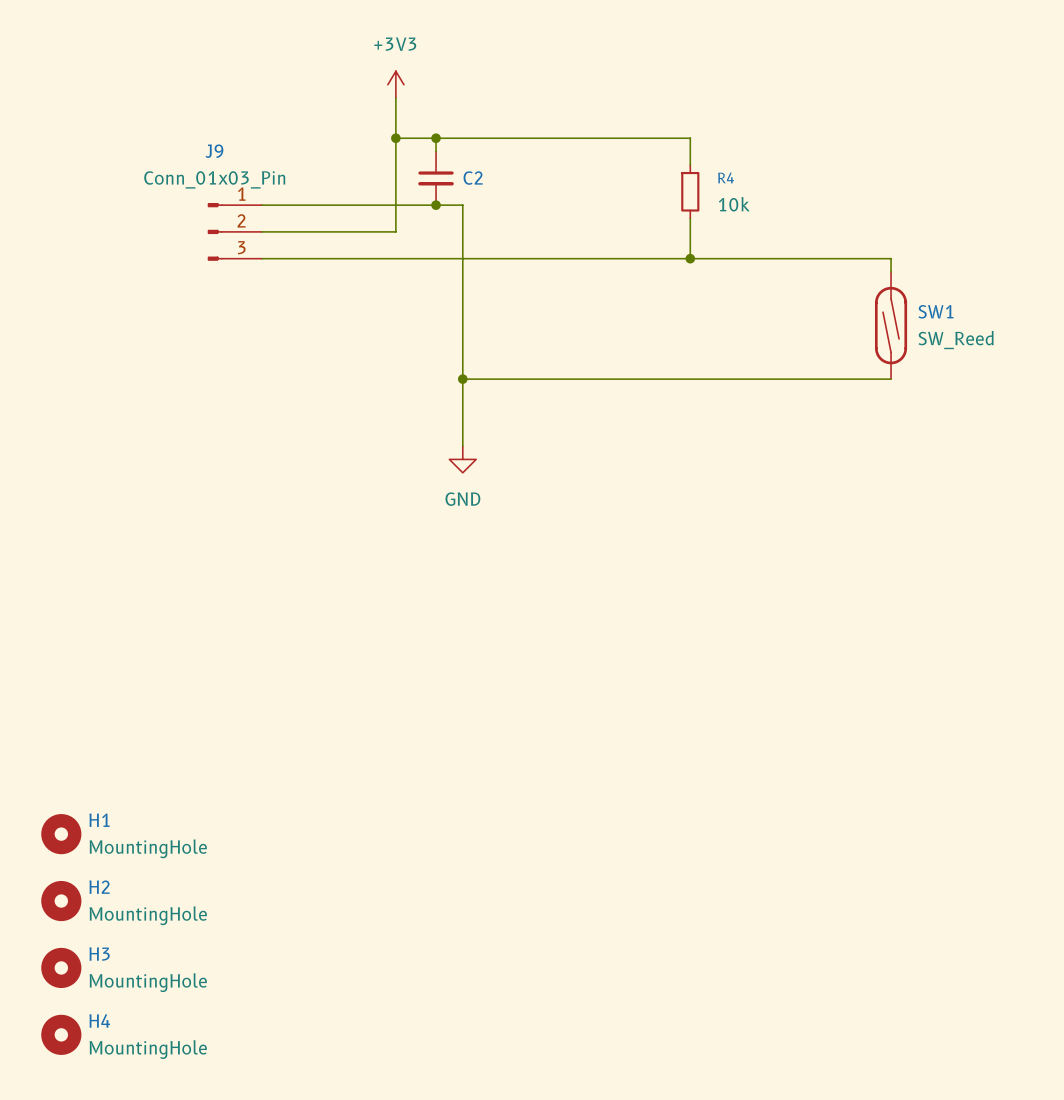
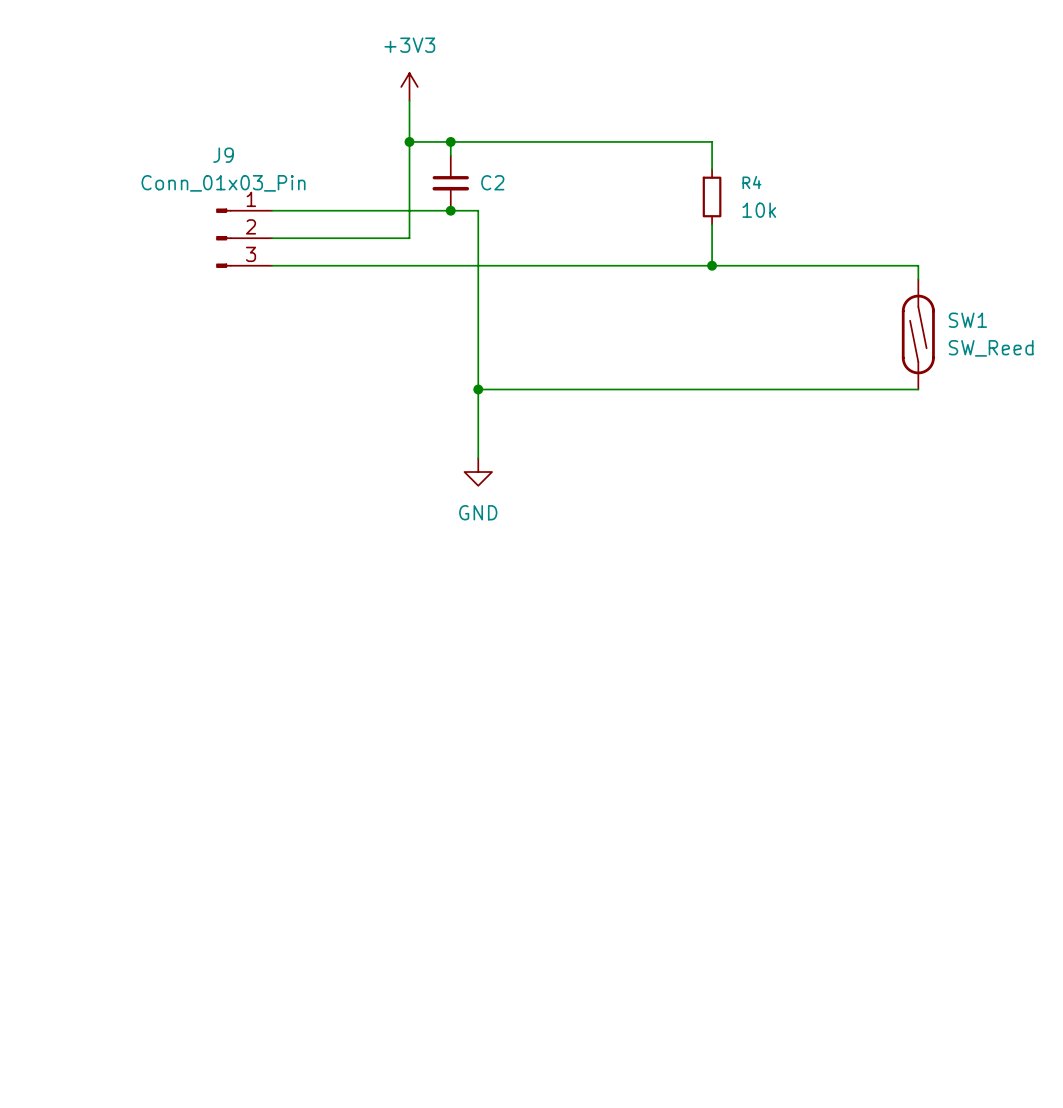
H1: MountingHole (61, 834) -> none
H2: MountingHole (61, 901) -> none
H3: MountingHole (61, 967) -> none
H4: MountingHole (61, 1034) -> none

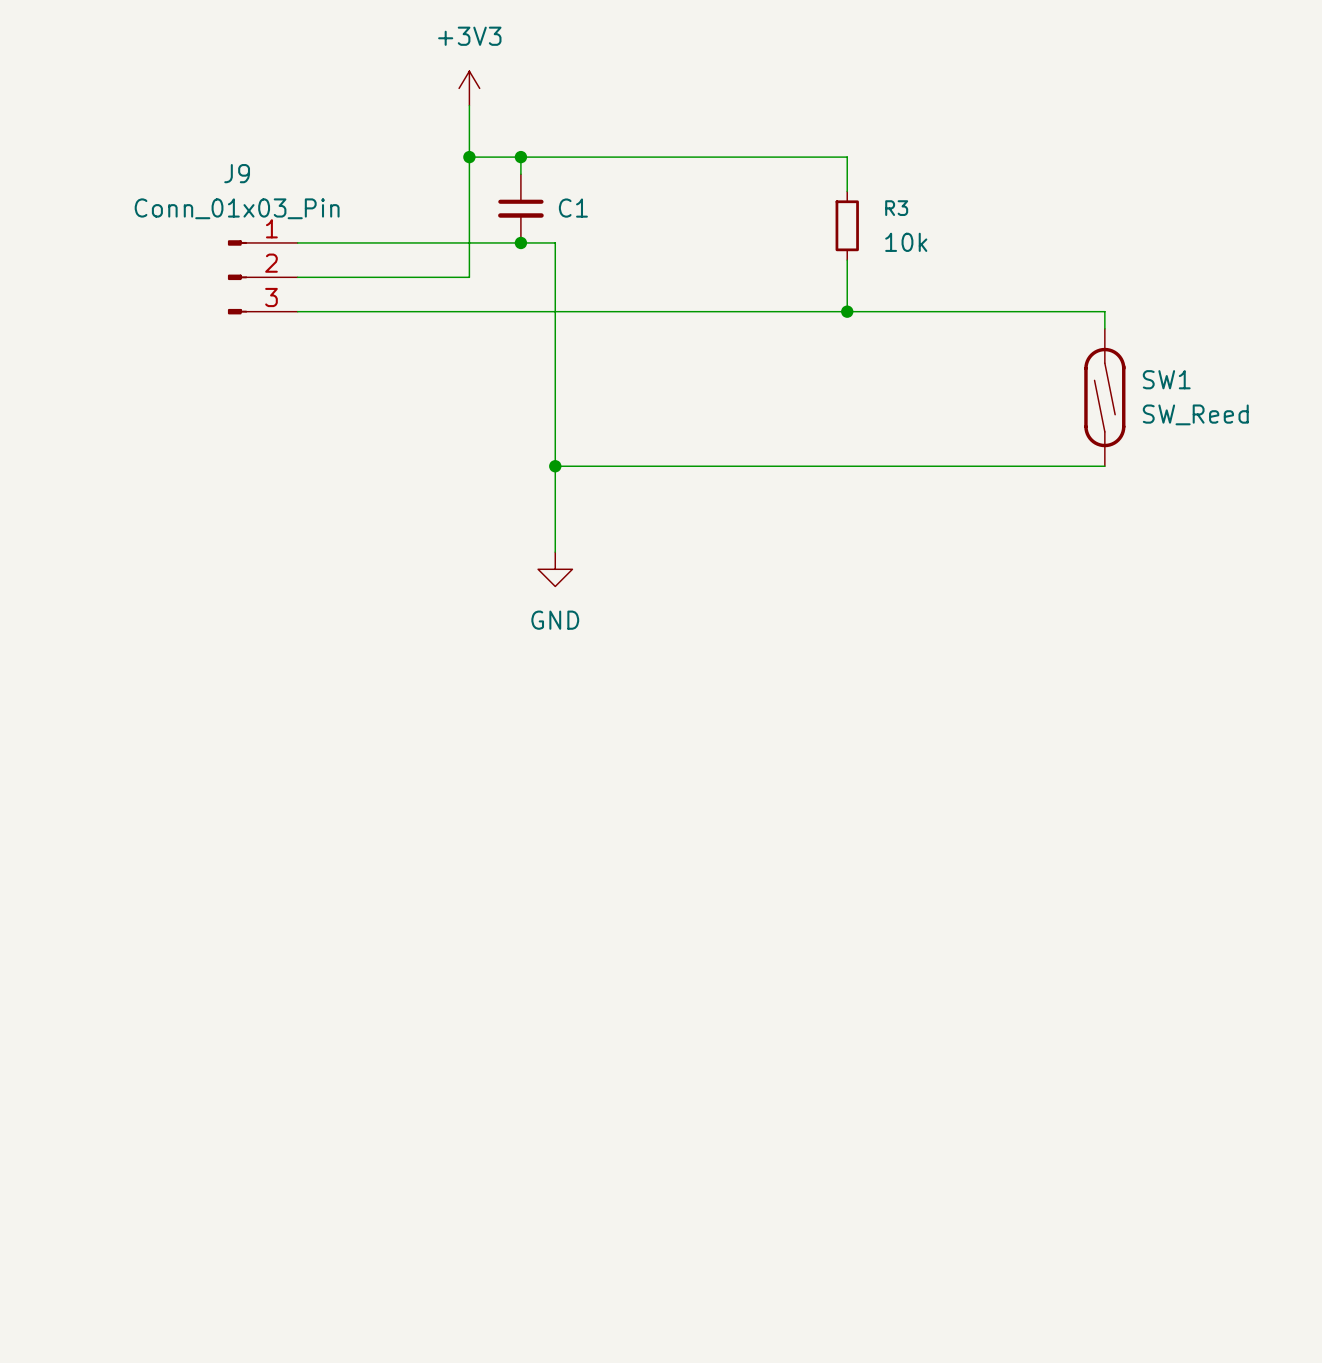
C2 name: C2 (492, 182) -> C1 (573, 208)
R4 name: R4 (751, 182) -> R3 (896, 208)

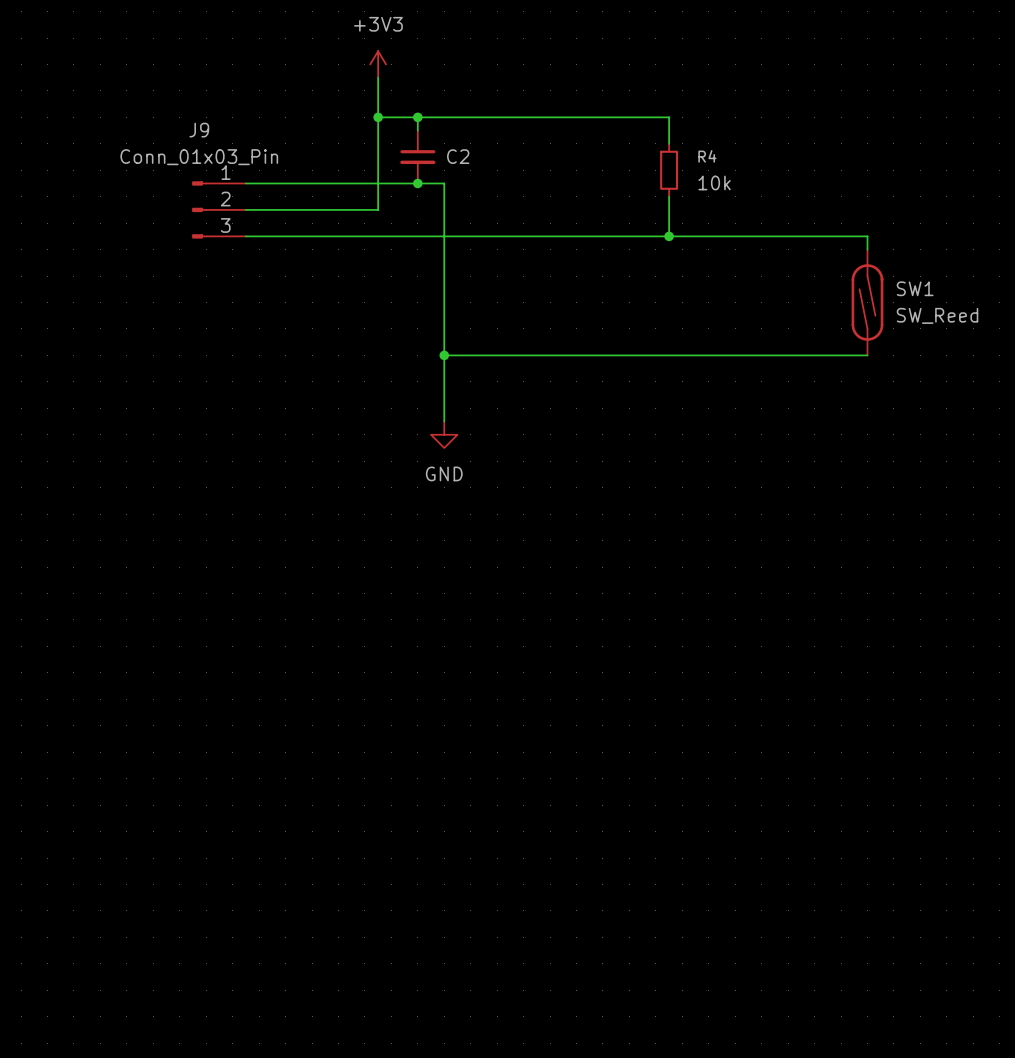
C1 name: C1 (573, 208) -> C2 (458, 156)
R3 name: R3 (896, 208) -> R4 (707, 156)

